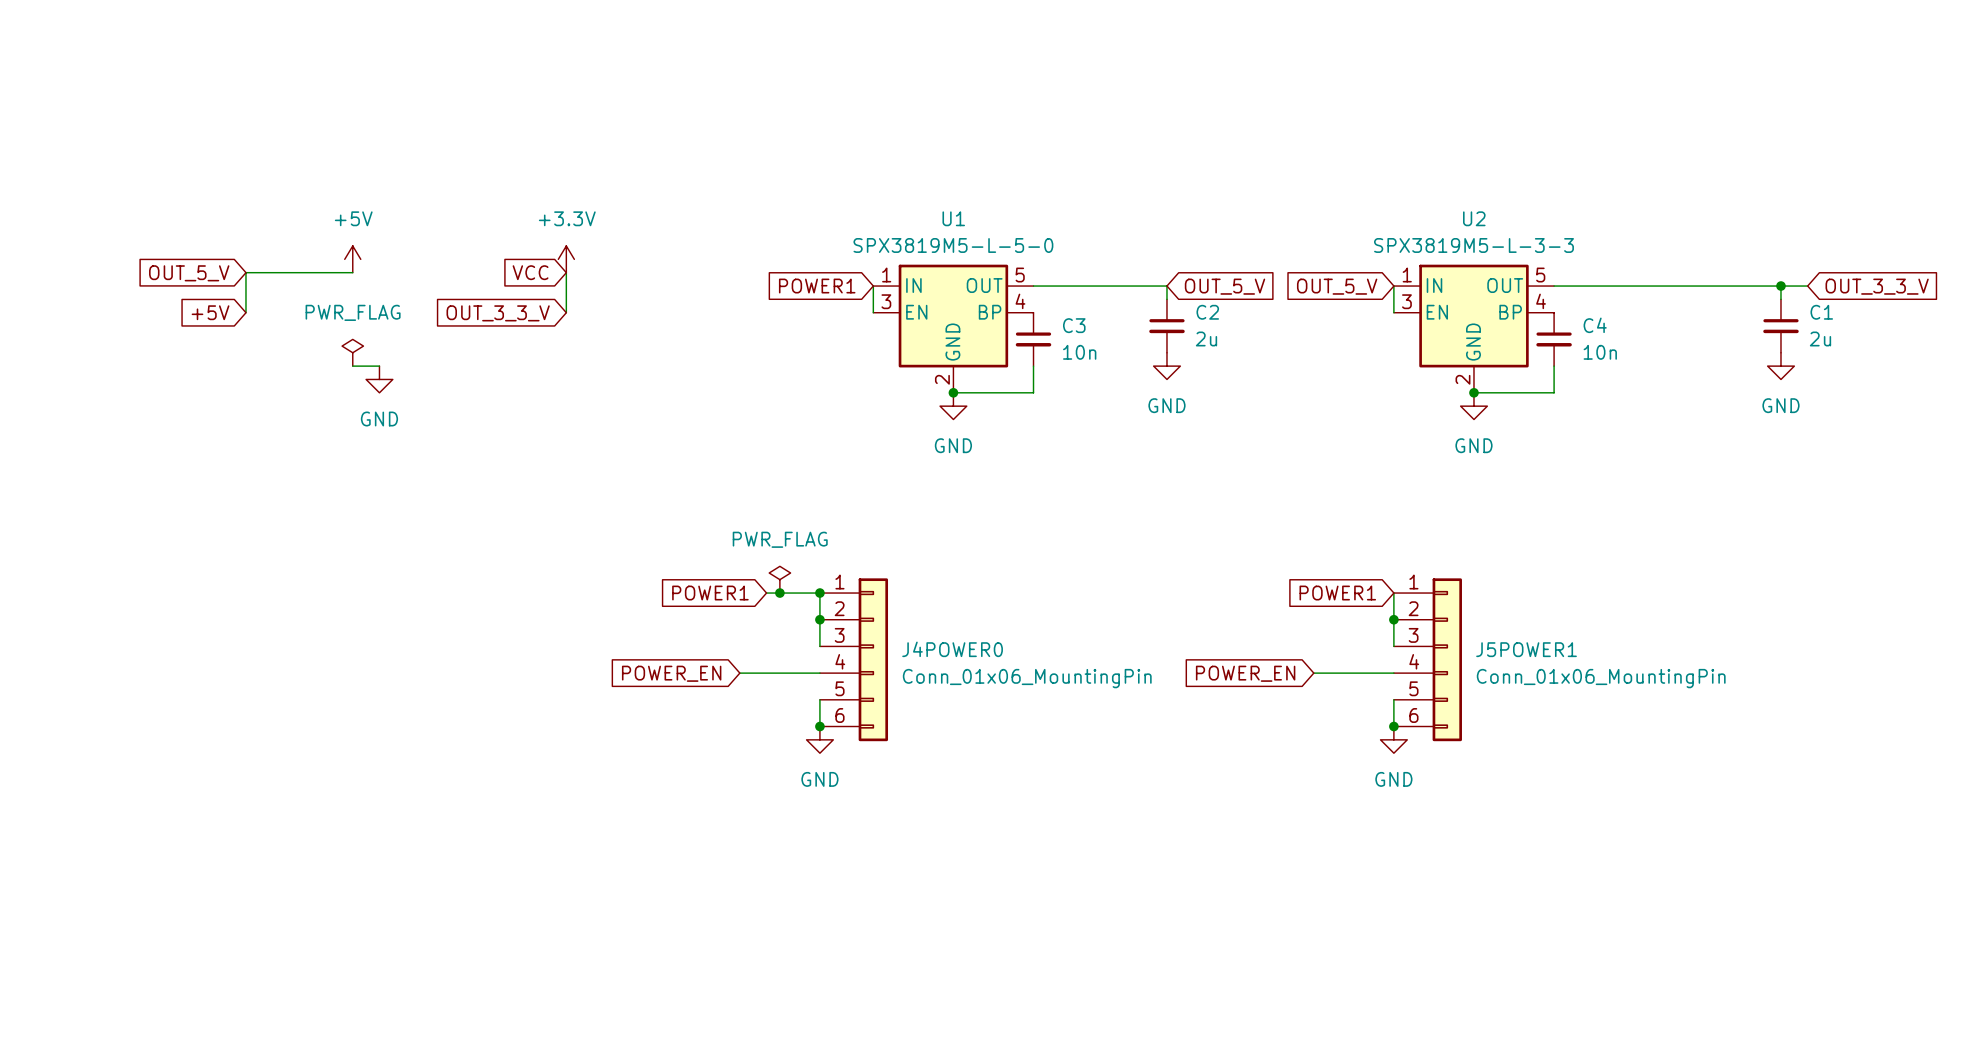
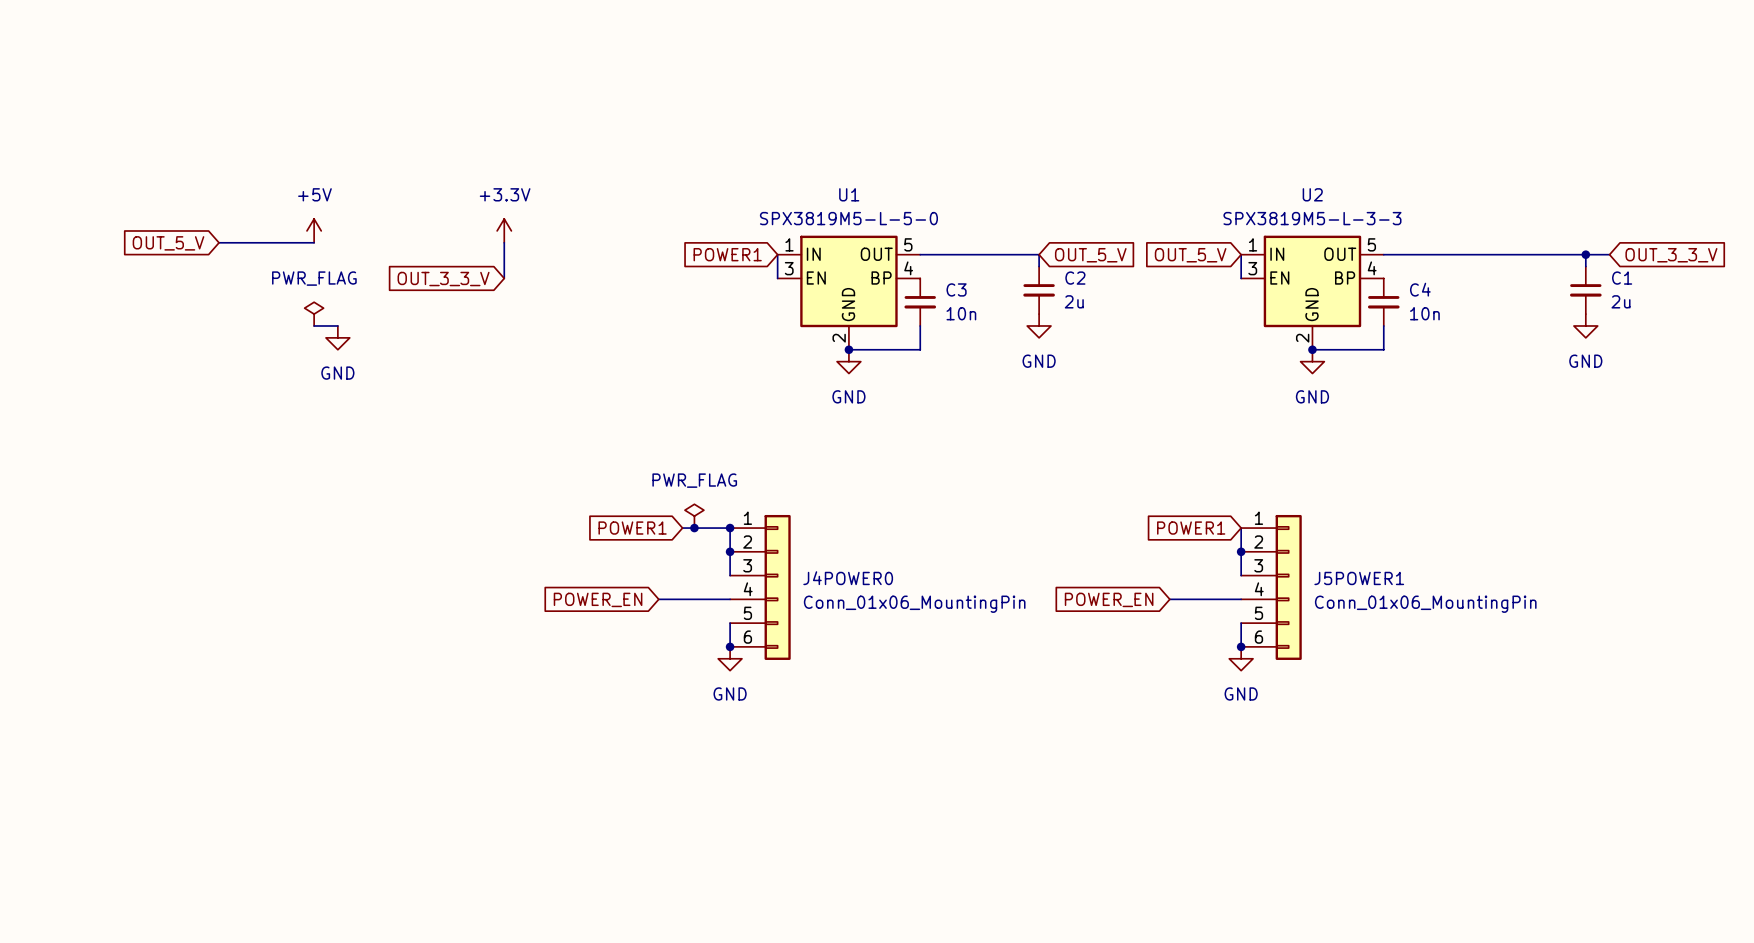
wire: (245, 272) (245, 312) -> none
global label: VCC (530, 272) -> none
global label: +5V (210, 312) -> none

